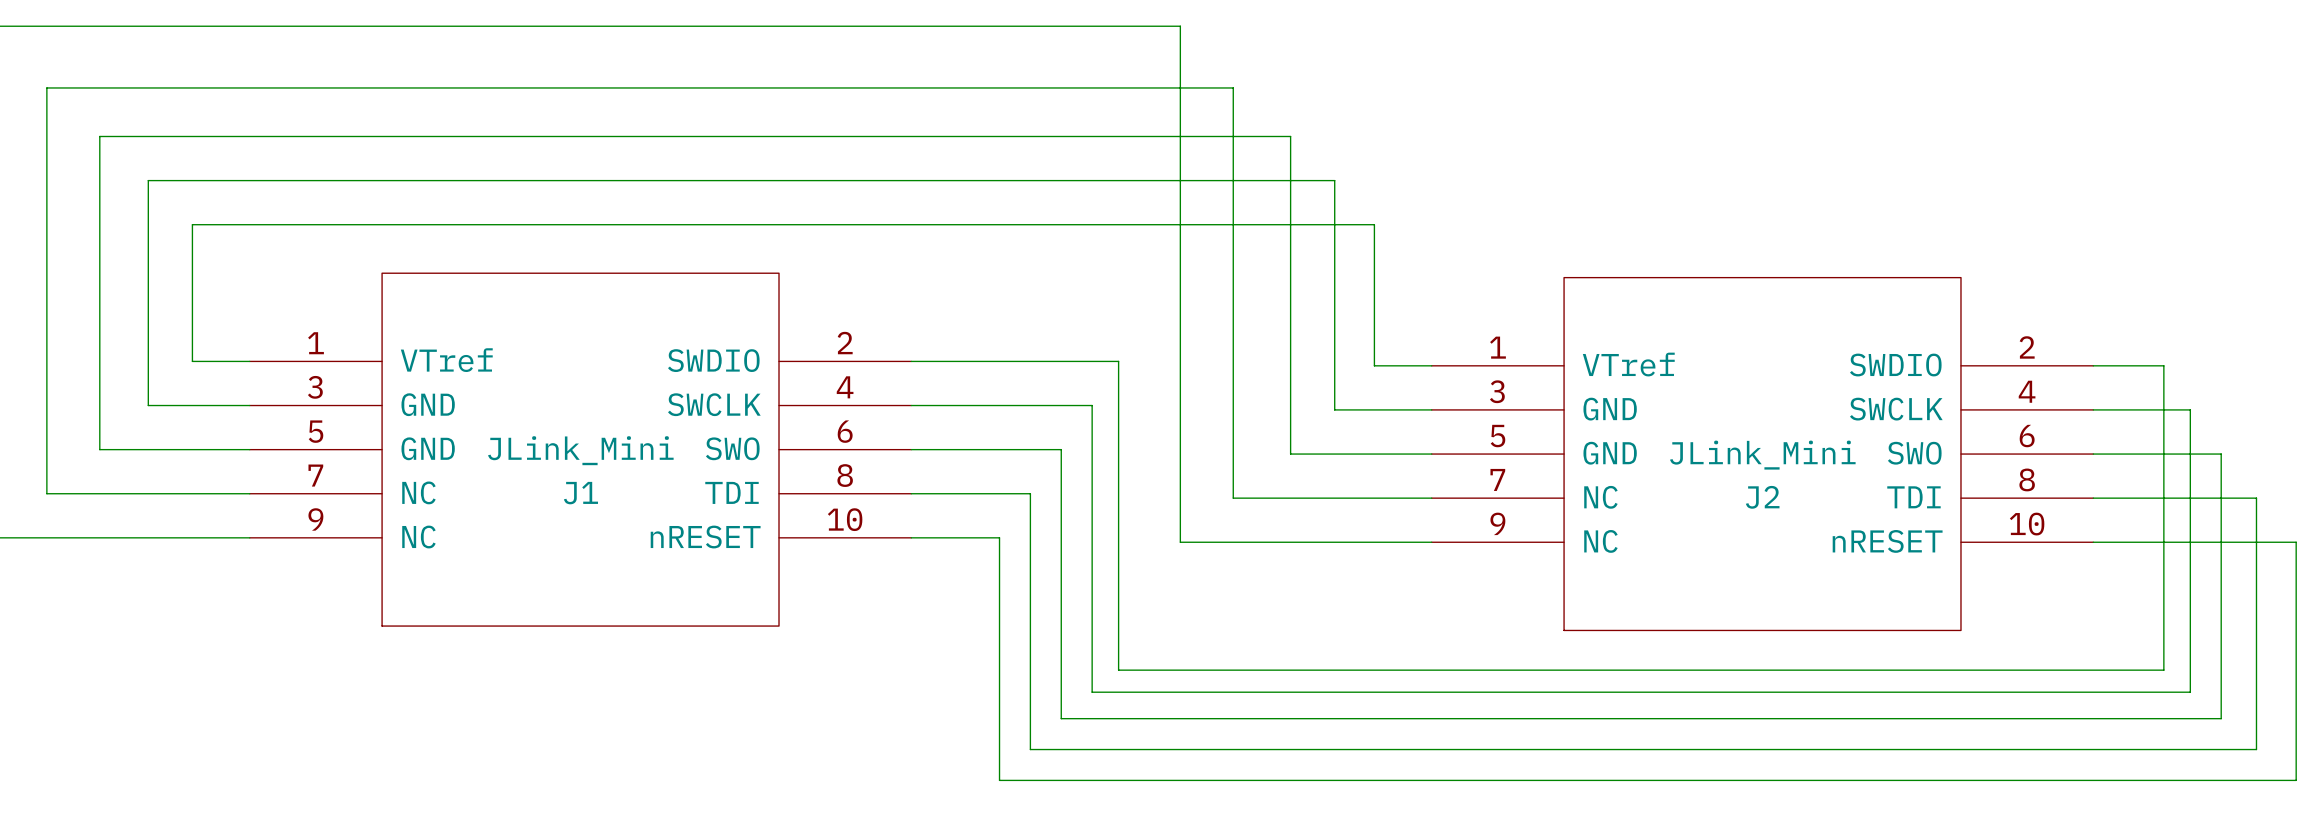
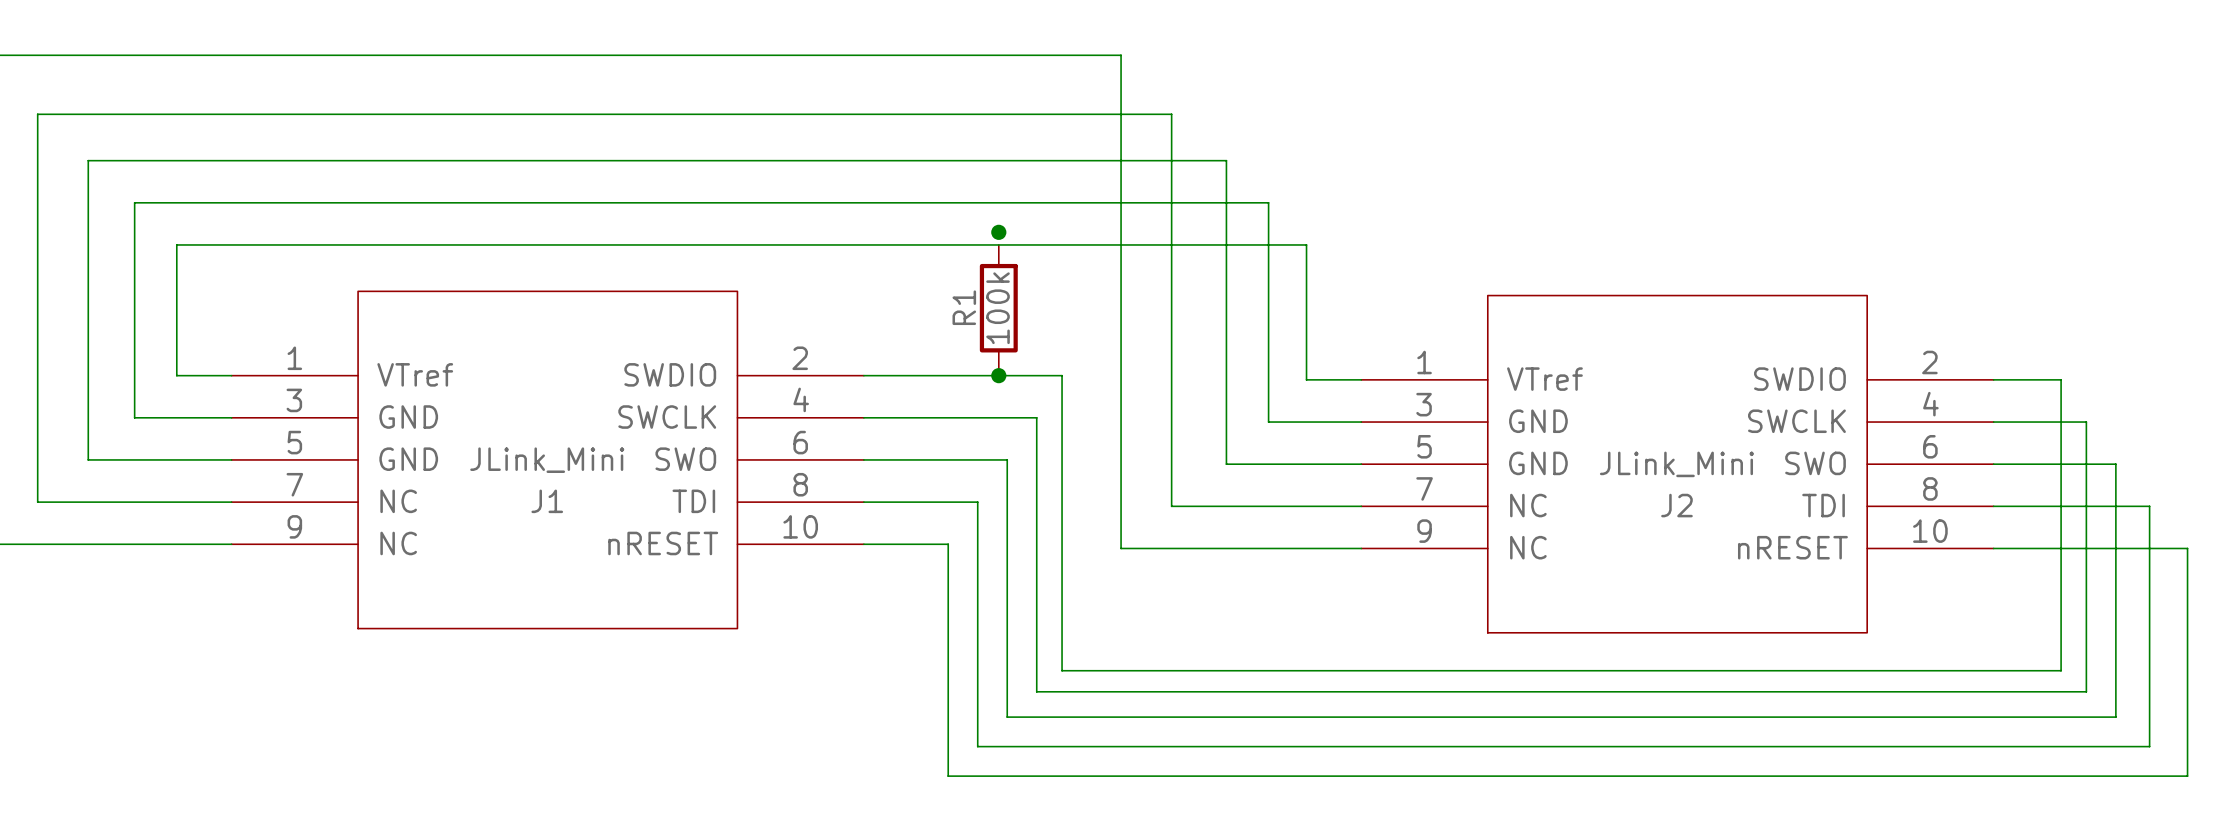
junction: none -> (998, 232)
R1: none -> 100k (998, 308)
junction: none -> (998, 375)

